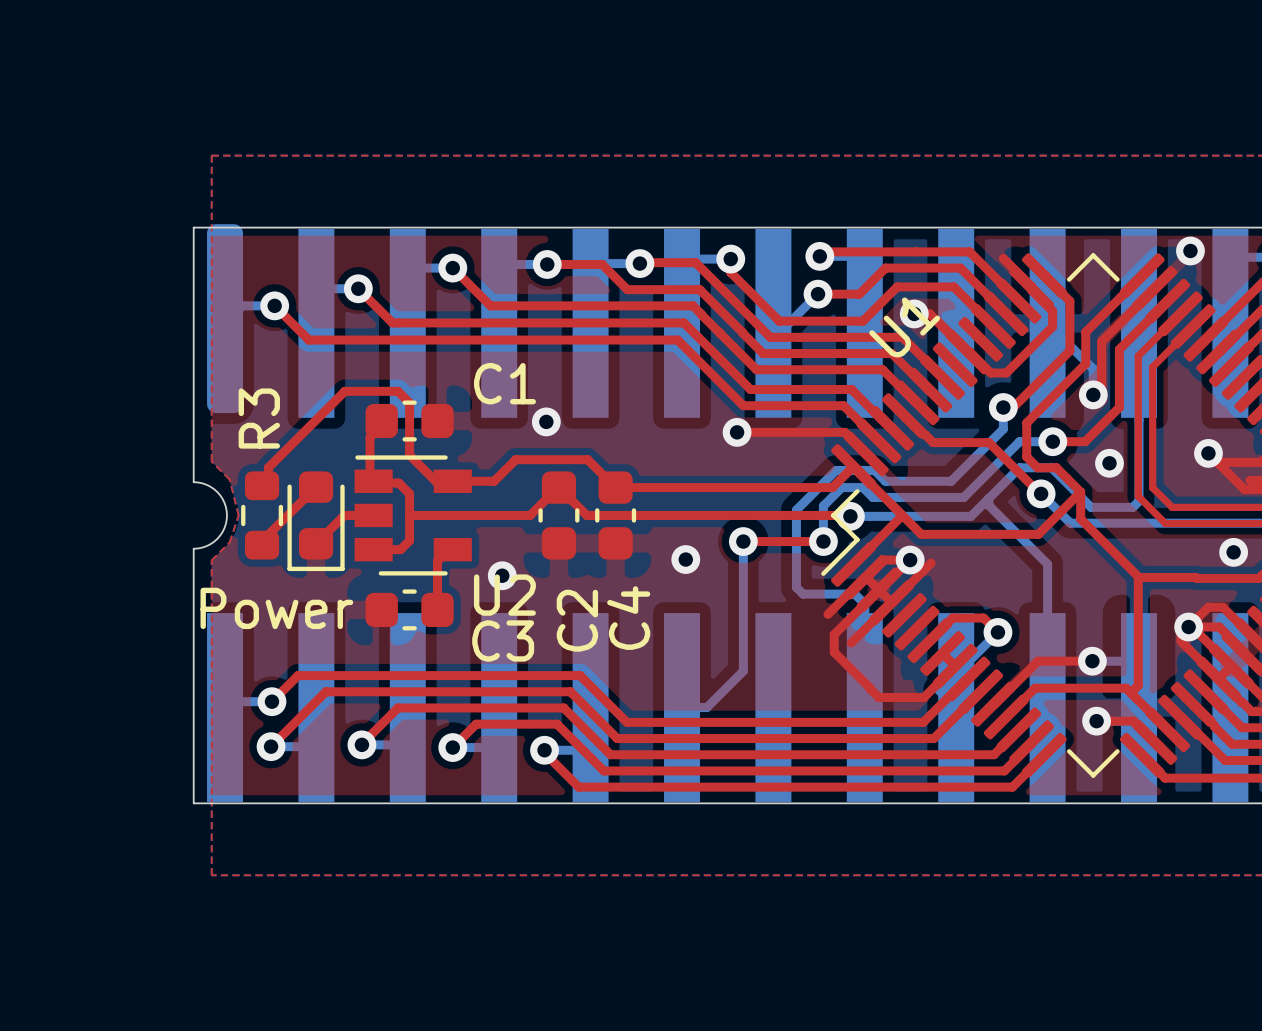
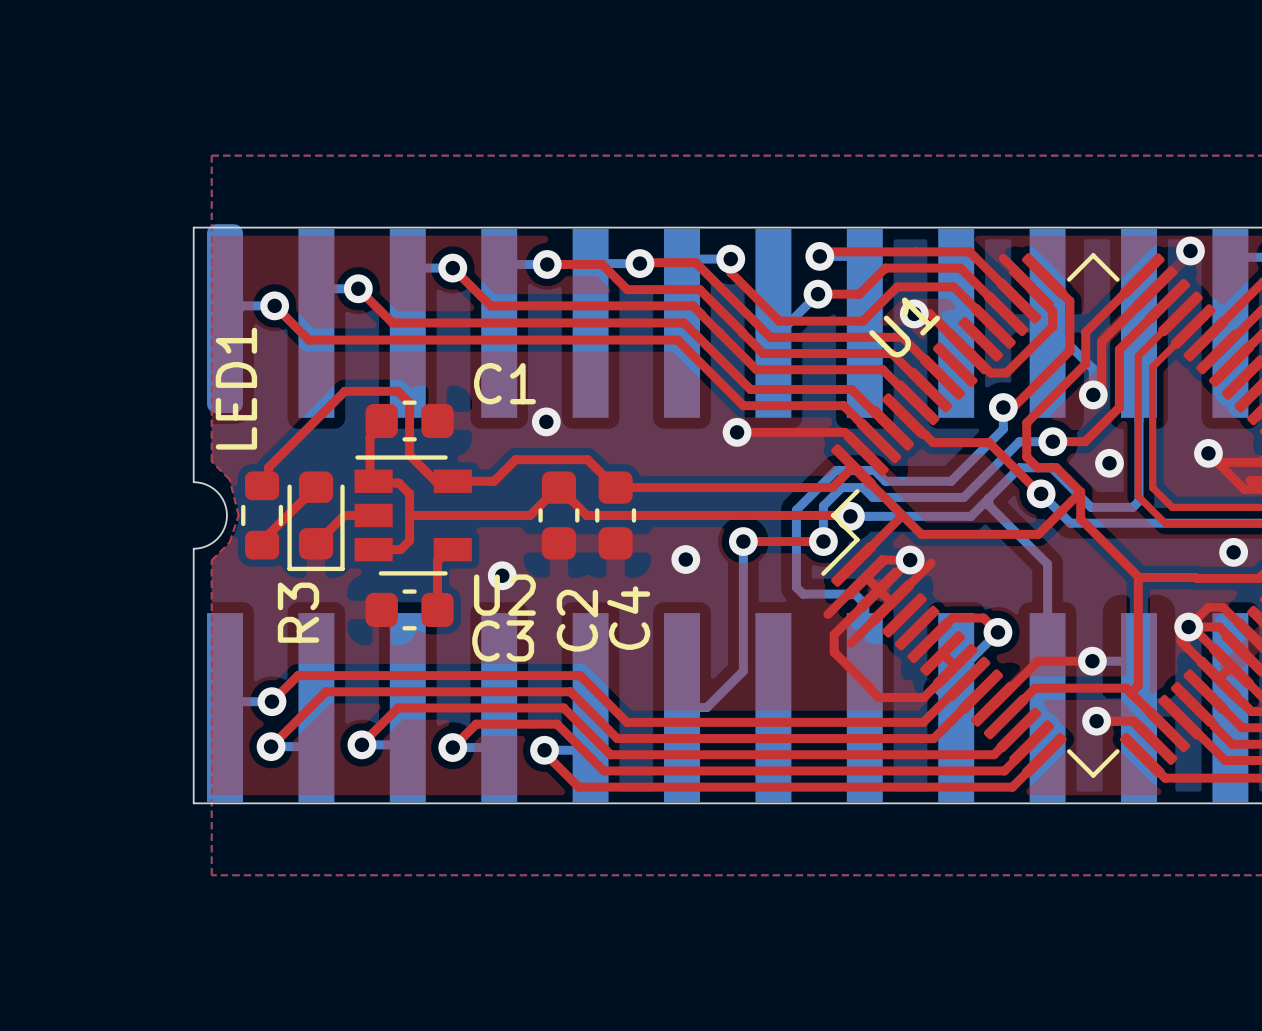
R3 name position: R3 (259, 418) -> R3 (298, 612)
Power name: Power (276, 608) -> LED1 (236, 388)

